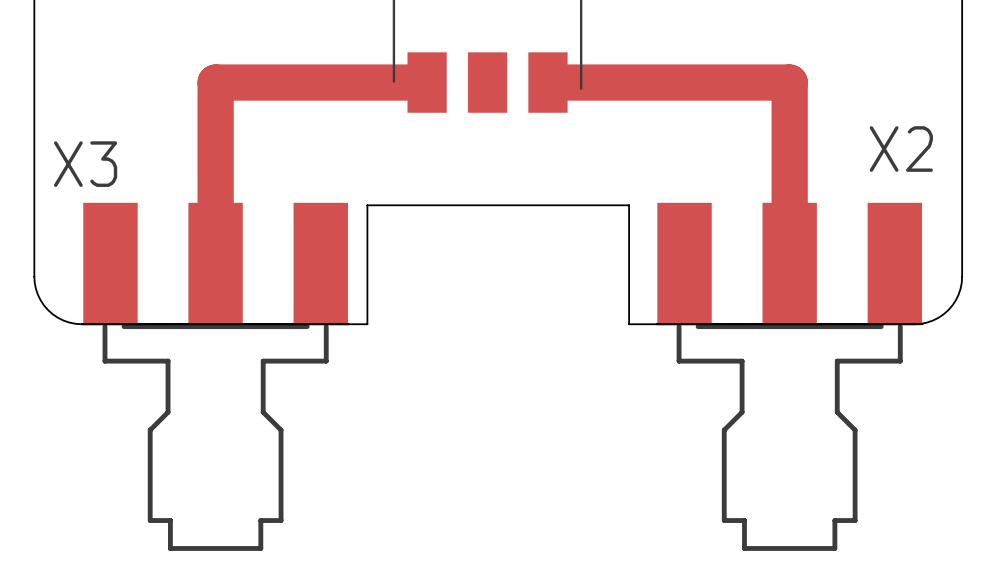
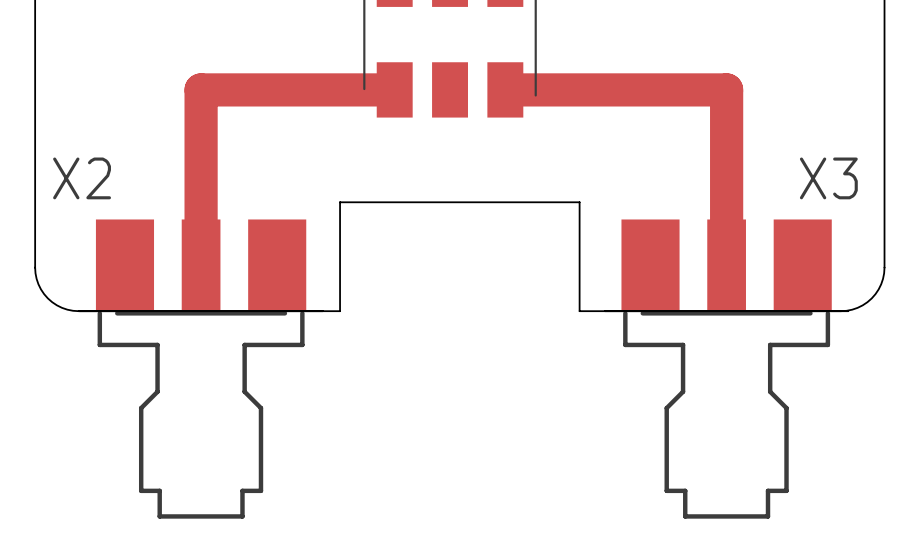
X2 name position: X2 (901, 149) -> X2 (82, 178)
X3 name position: X3 (85, 164) -> X3 (828, 178)
X3 footprint: [82, 202, 349, 551] -> [604, 219, 849, 519]
X2 footprint: [656, 202, 923, 551] -> [79, 219, 323, 519]

